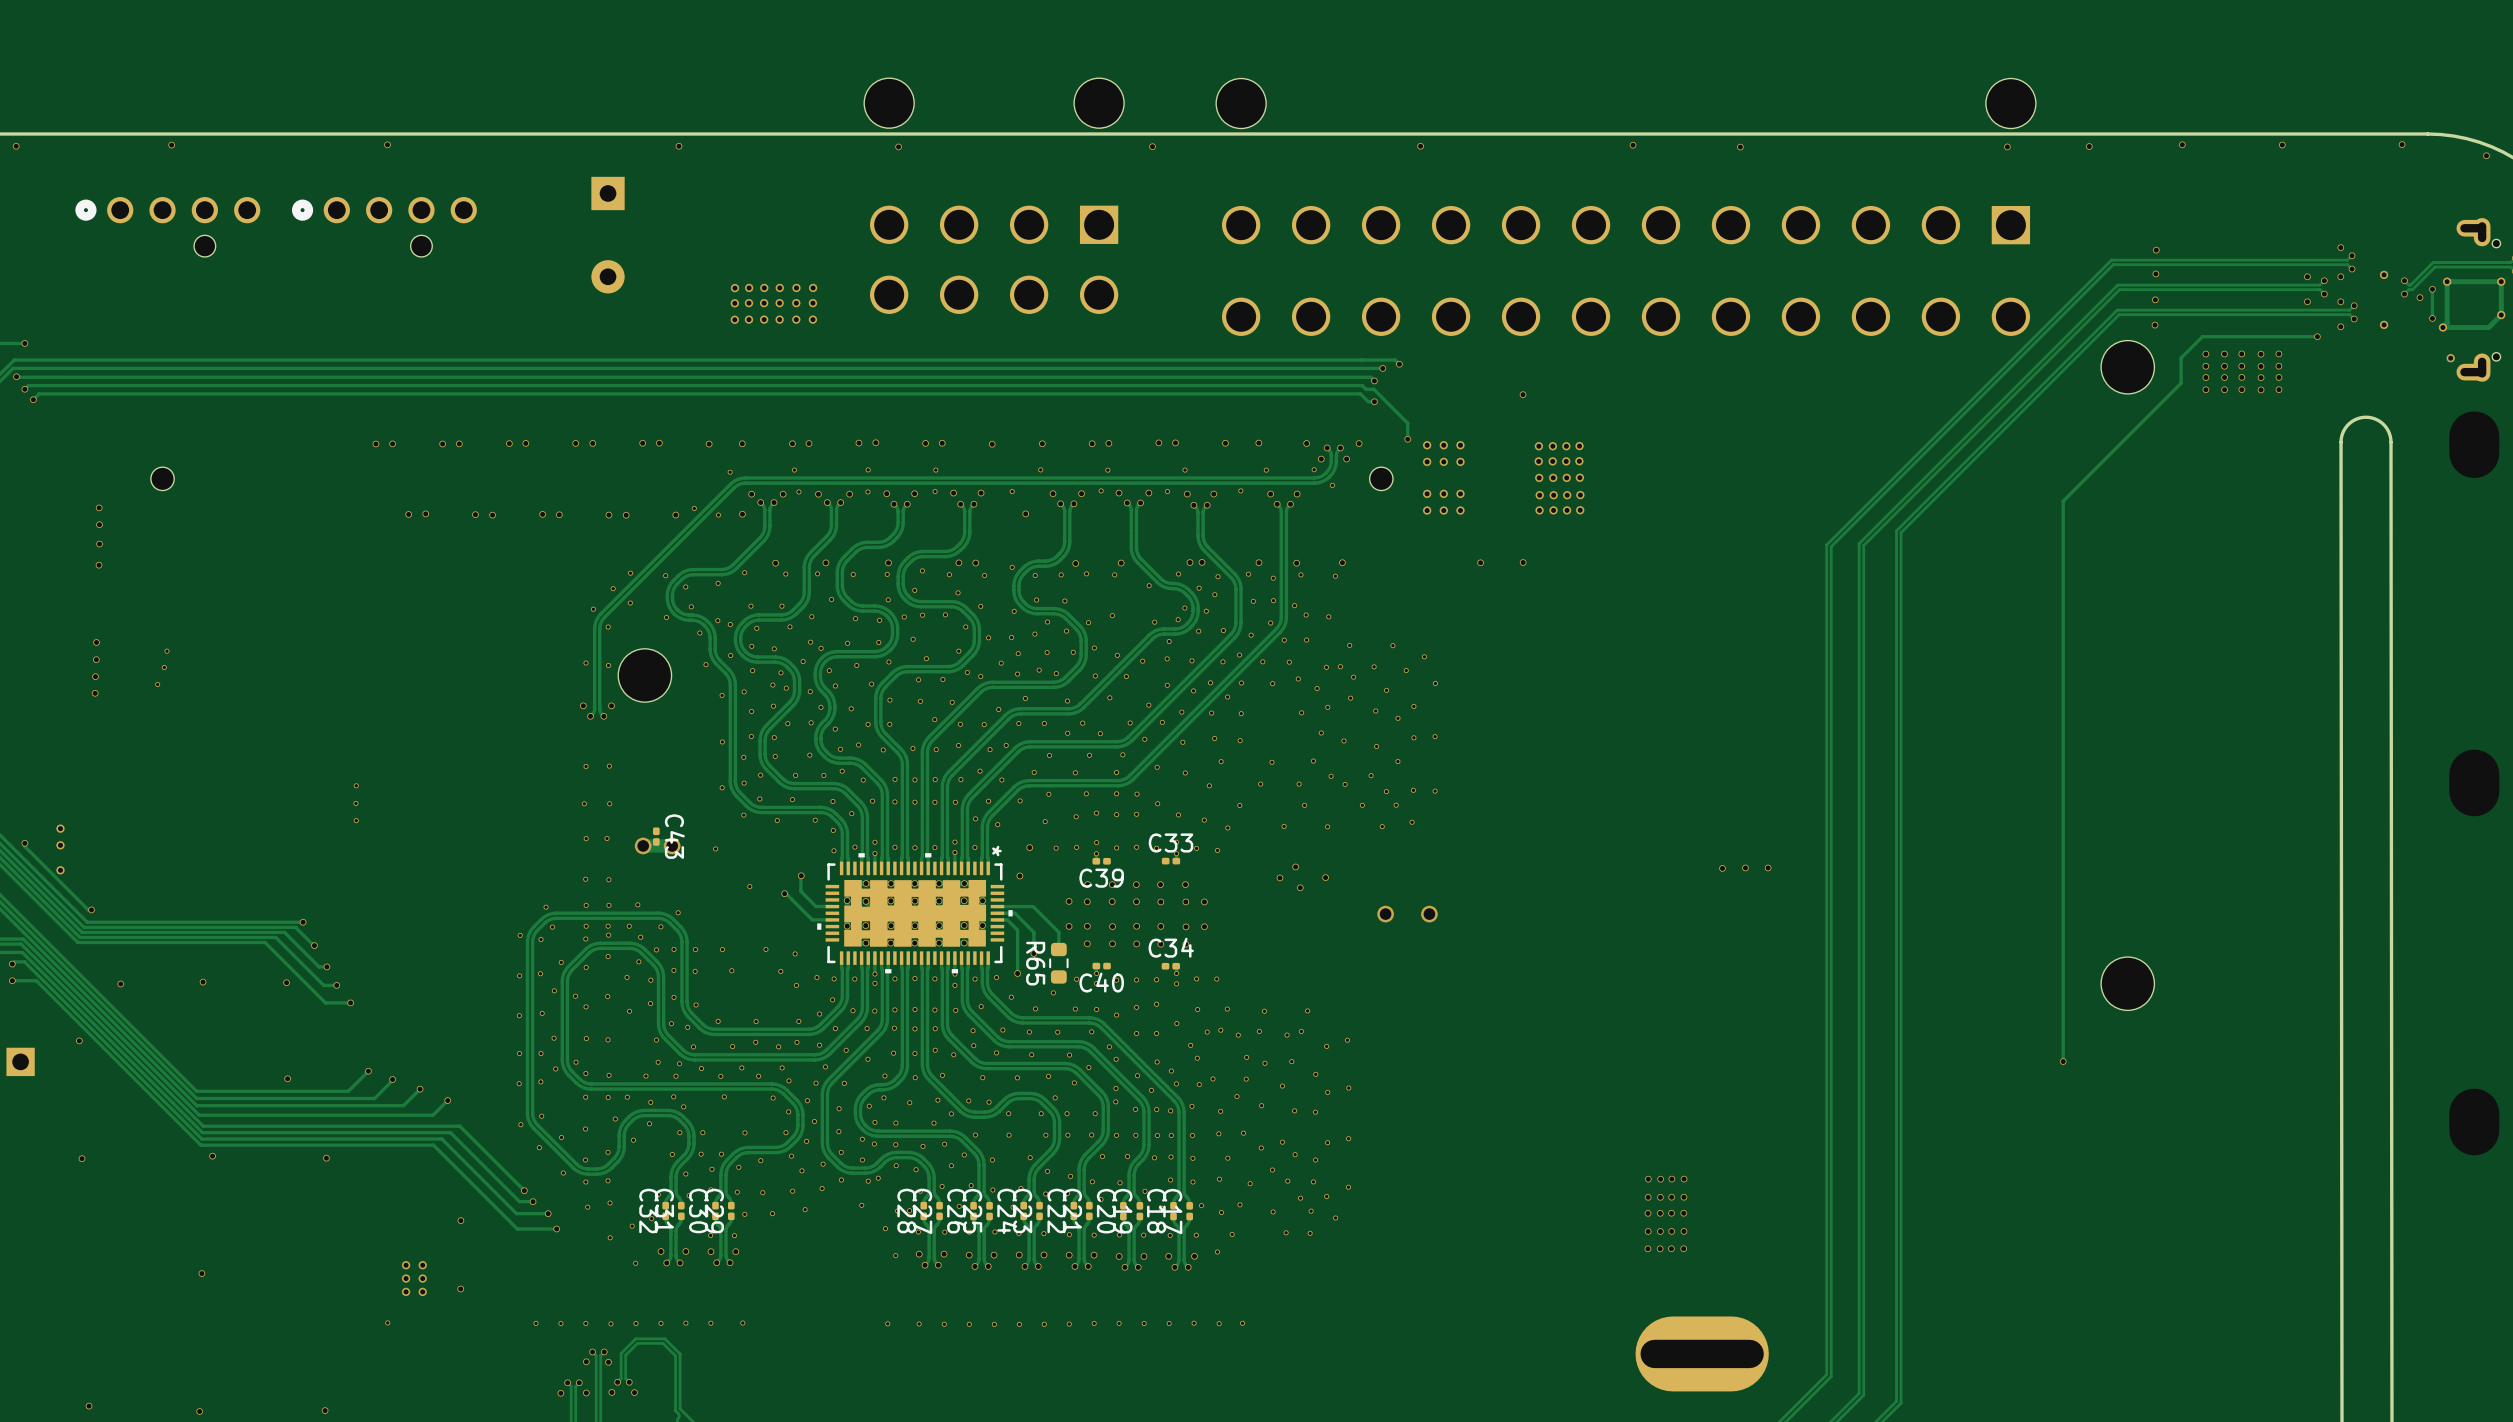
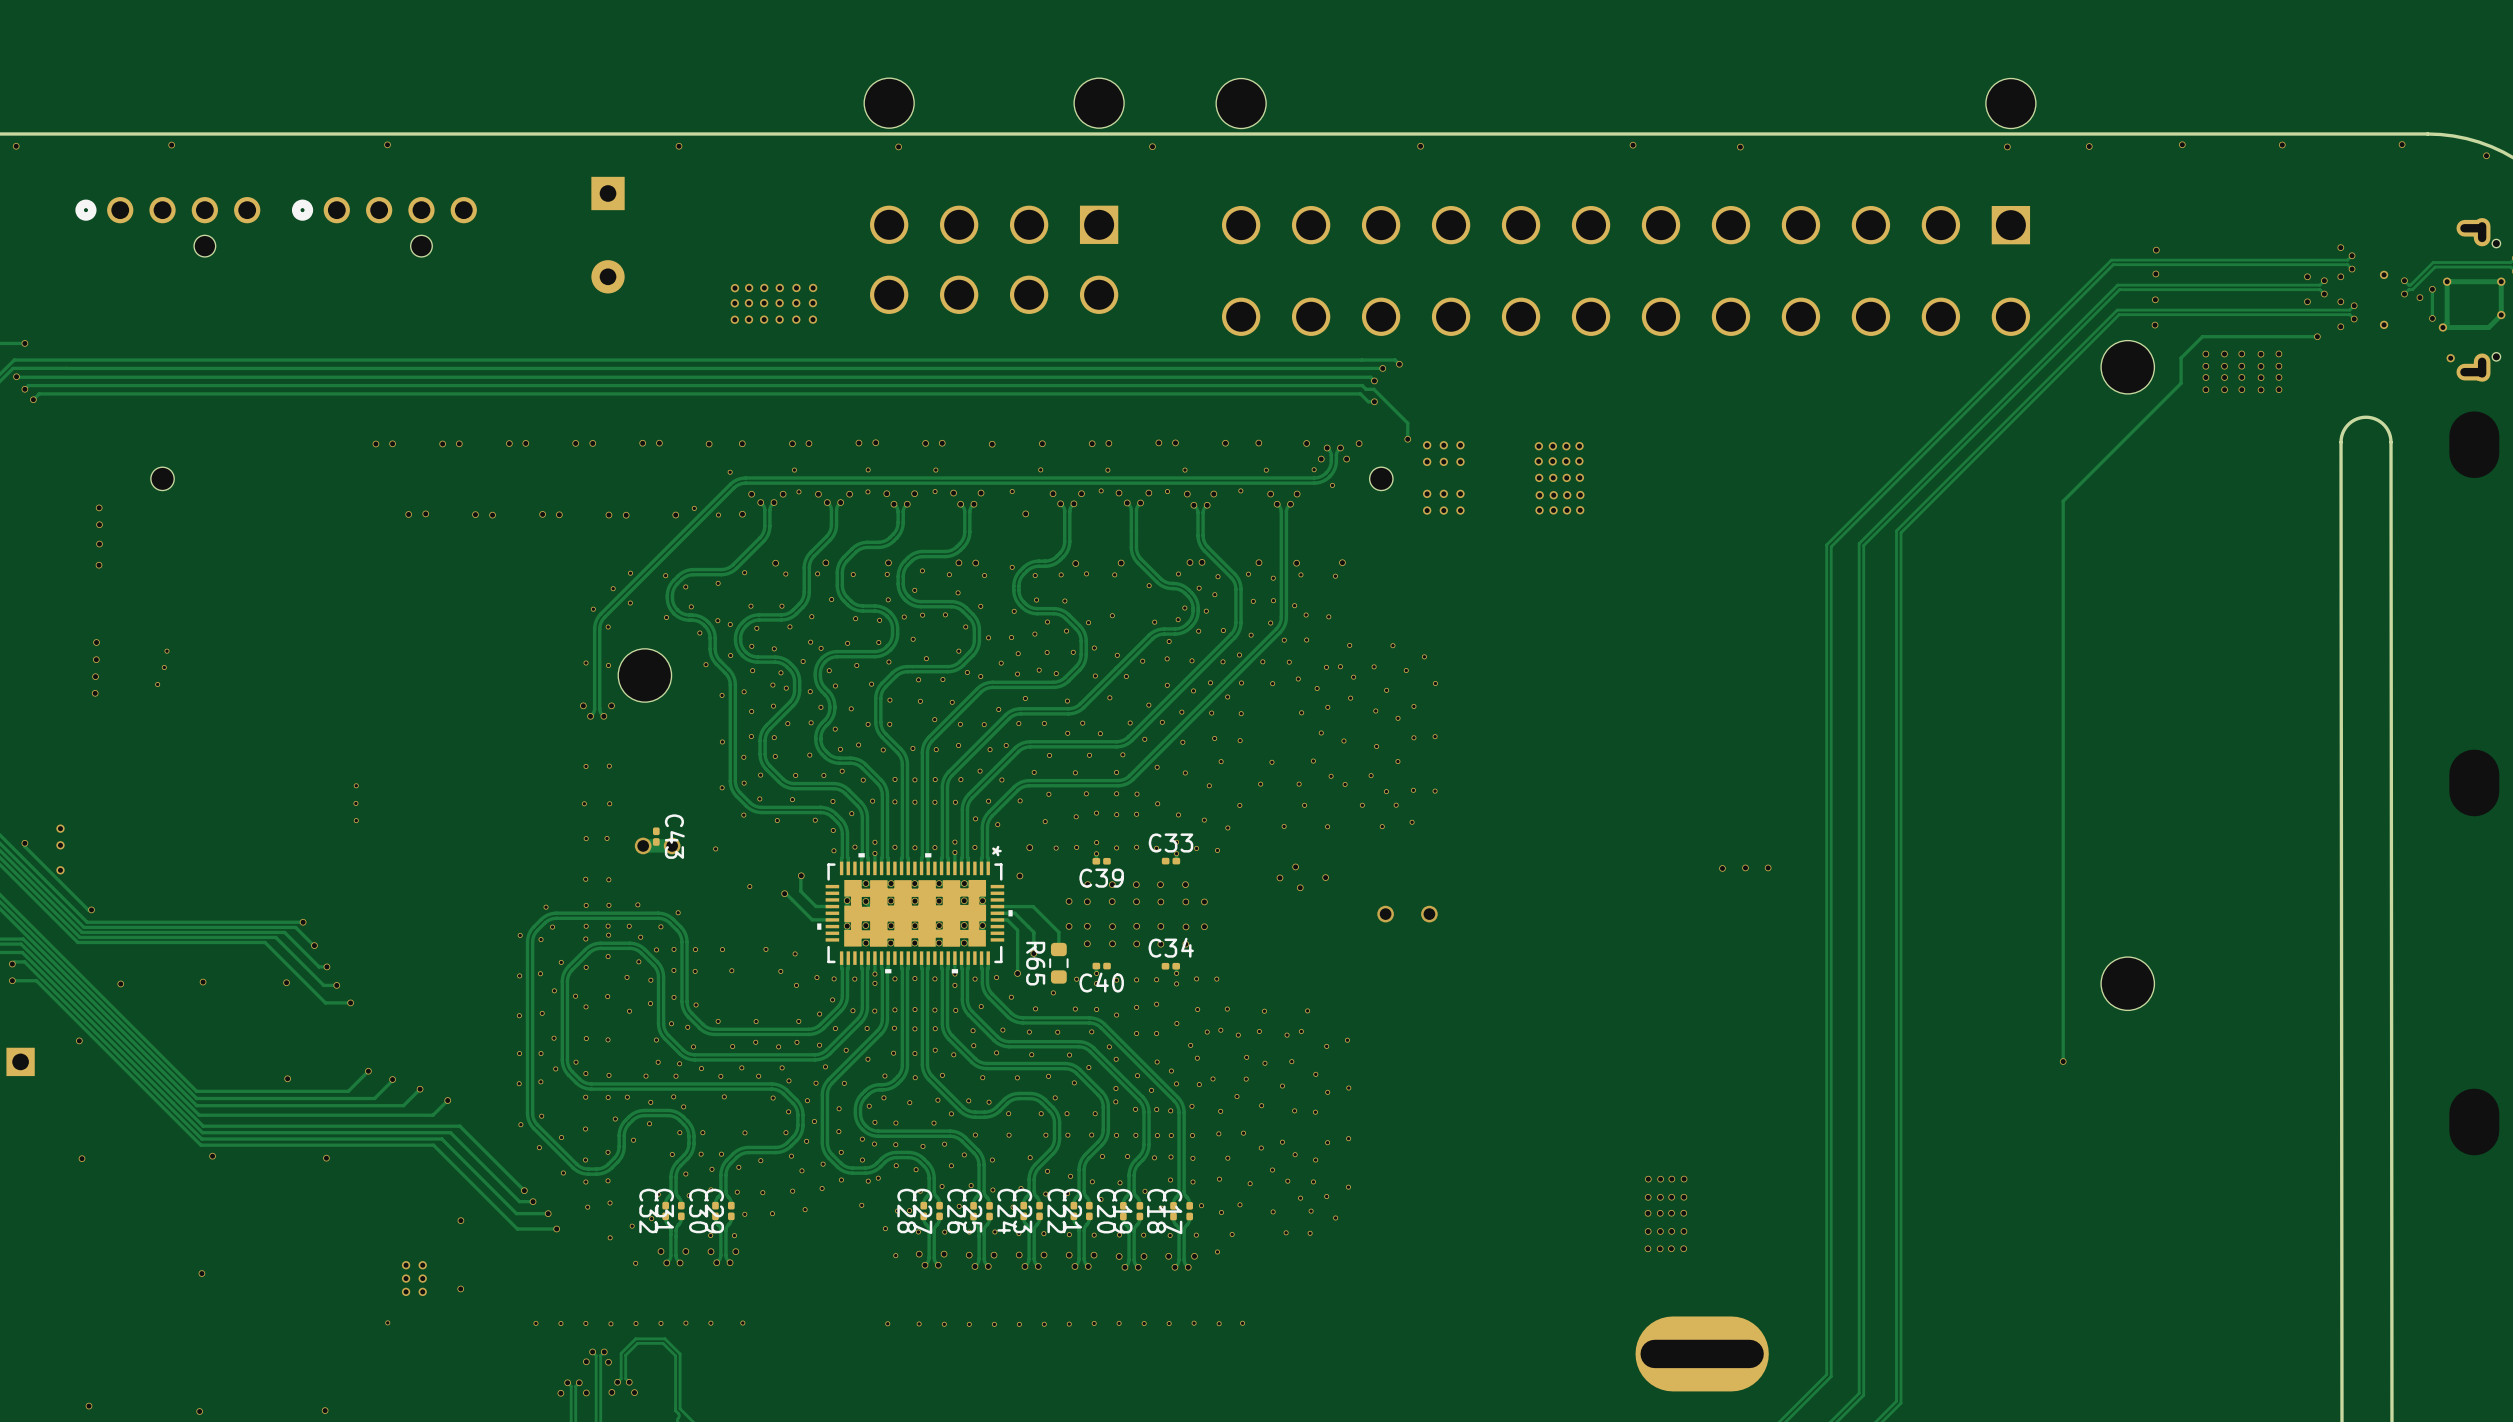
via: (1523, 394) -> none
via: (1480, 562) -> none
via: (1523, 562) -> none

